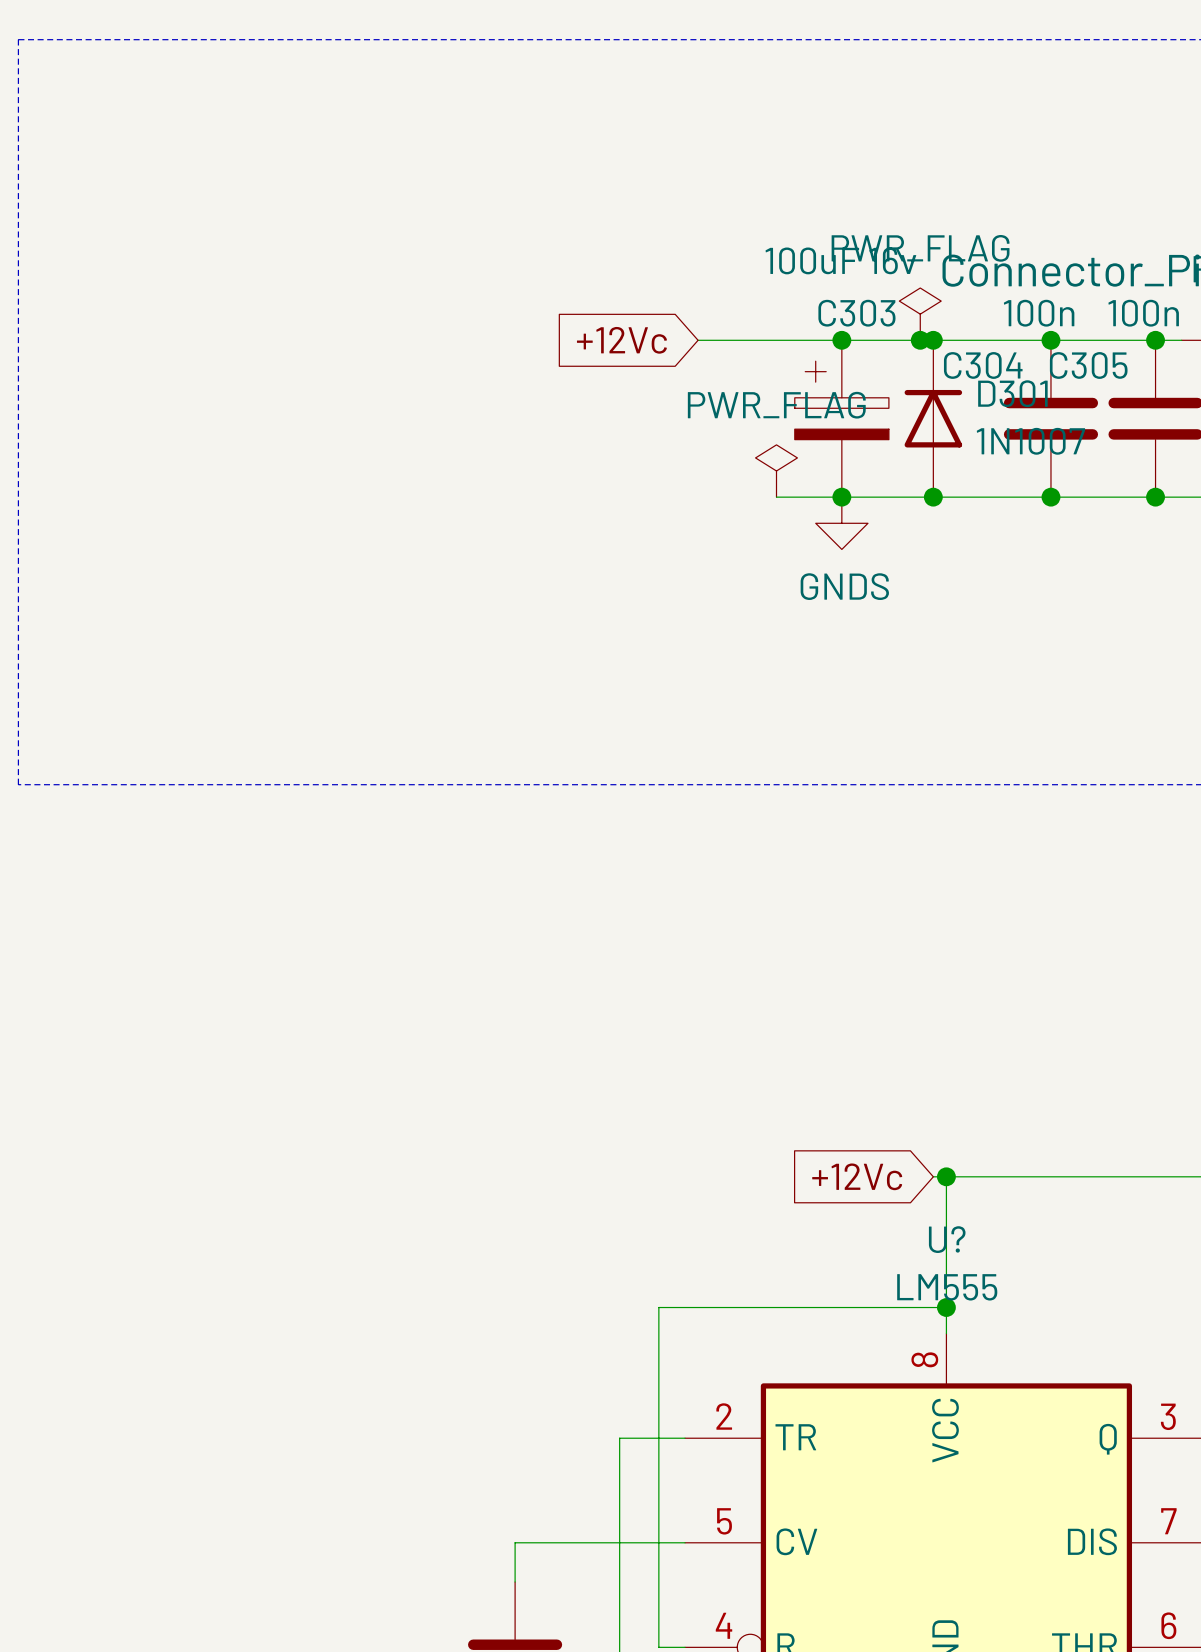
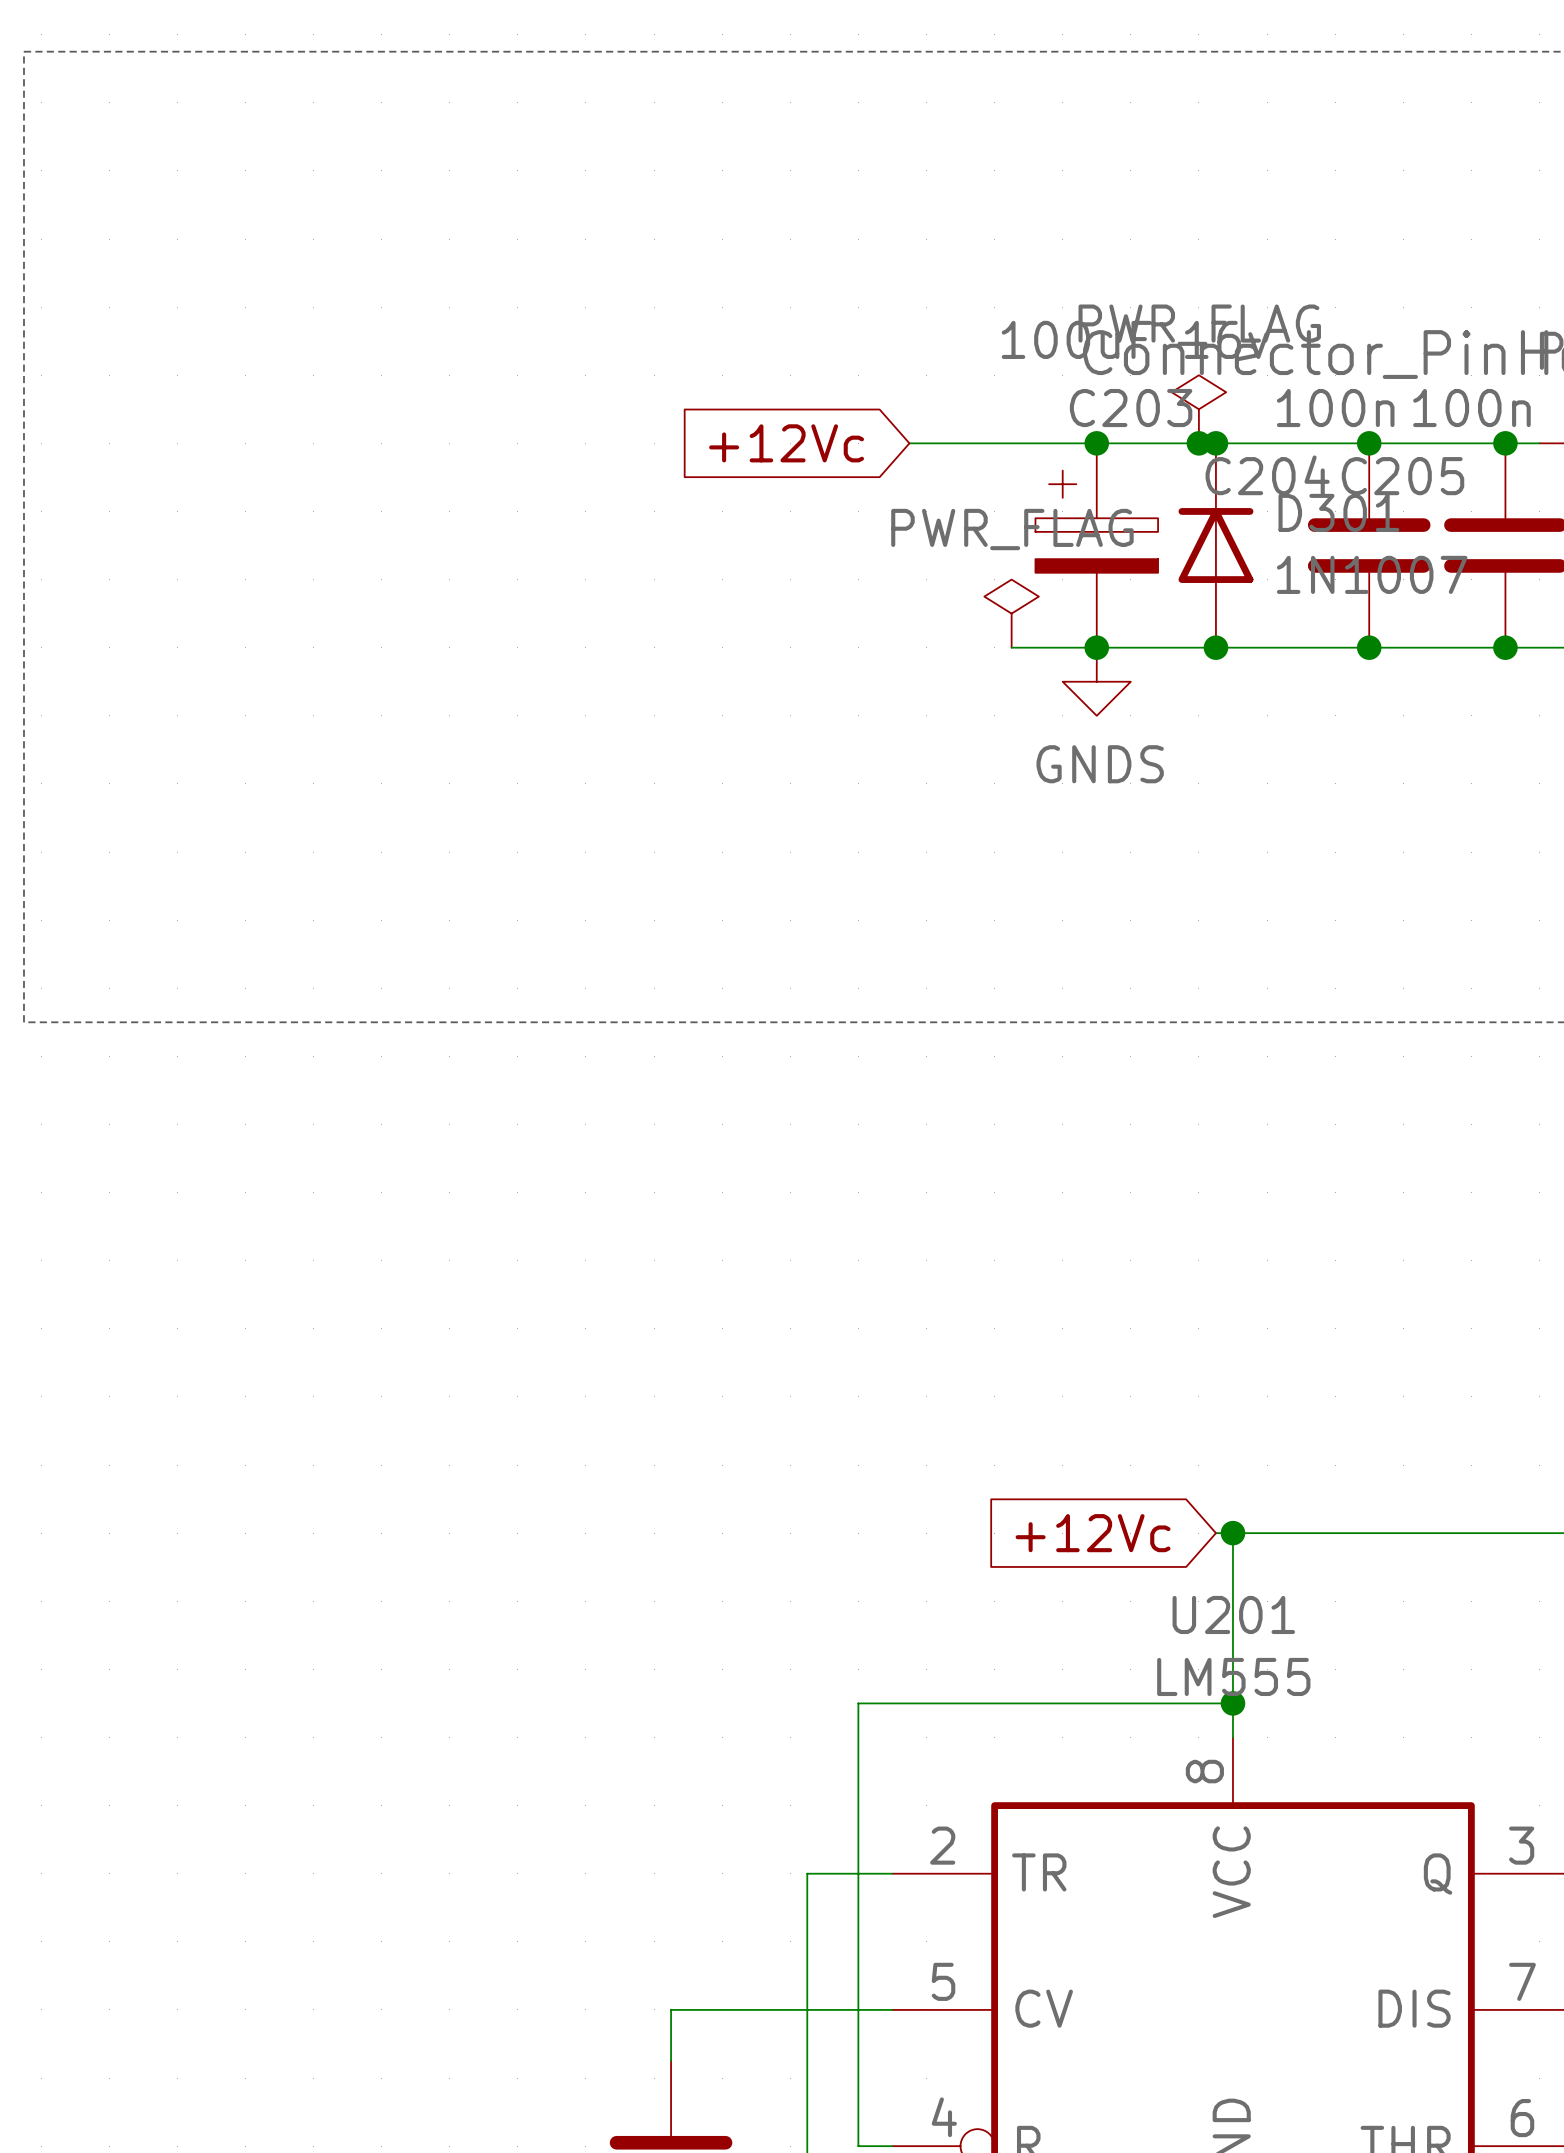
C303 name: C303 (856, 313) -> C203 (1131, 408)
C304 name: C304 (983, 365) -> C204 (1267, 475)
C305 name: C305 (1088, 365) -> C205 (1403, 476)
U? name: U? (947, 1239) -> U201 (1233, 1614)

